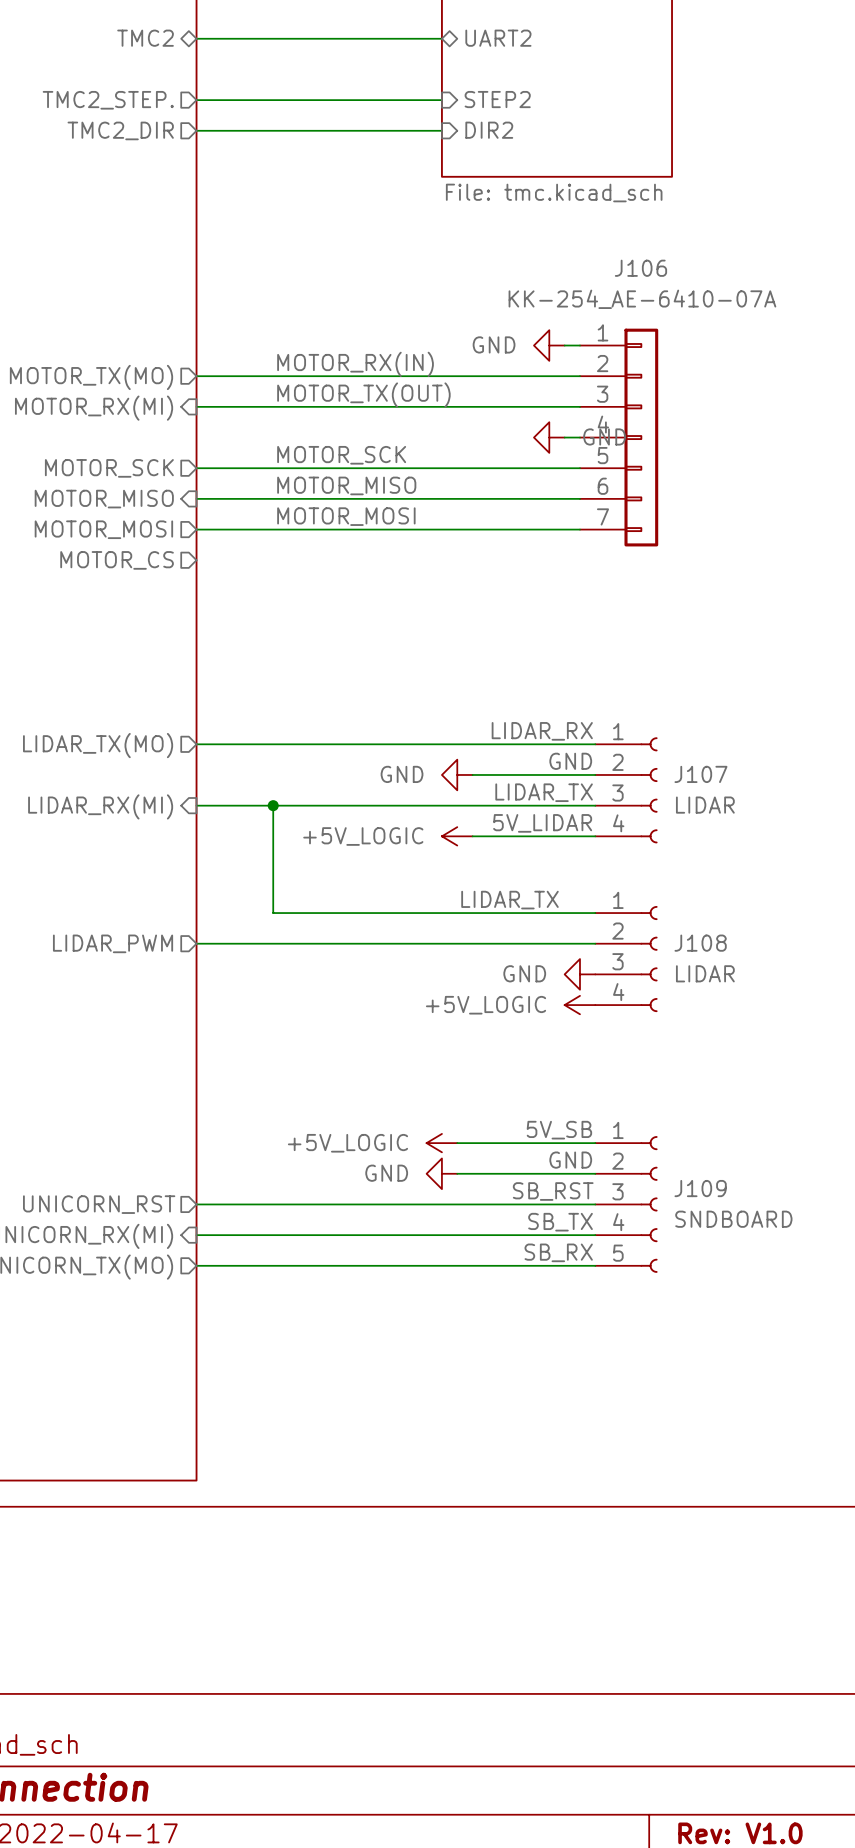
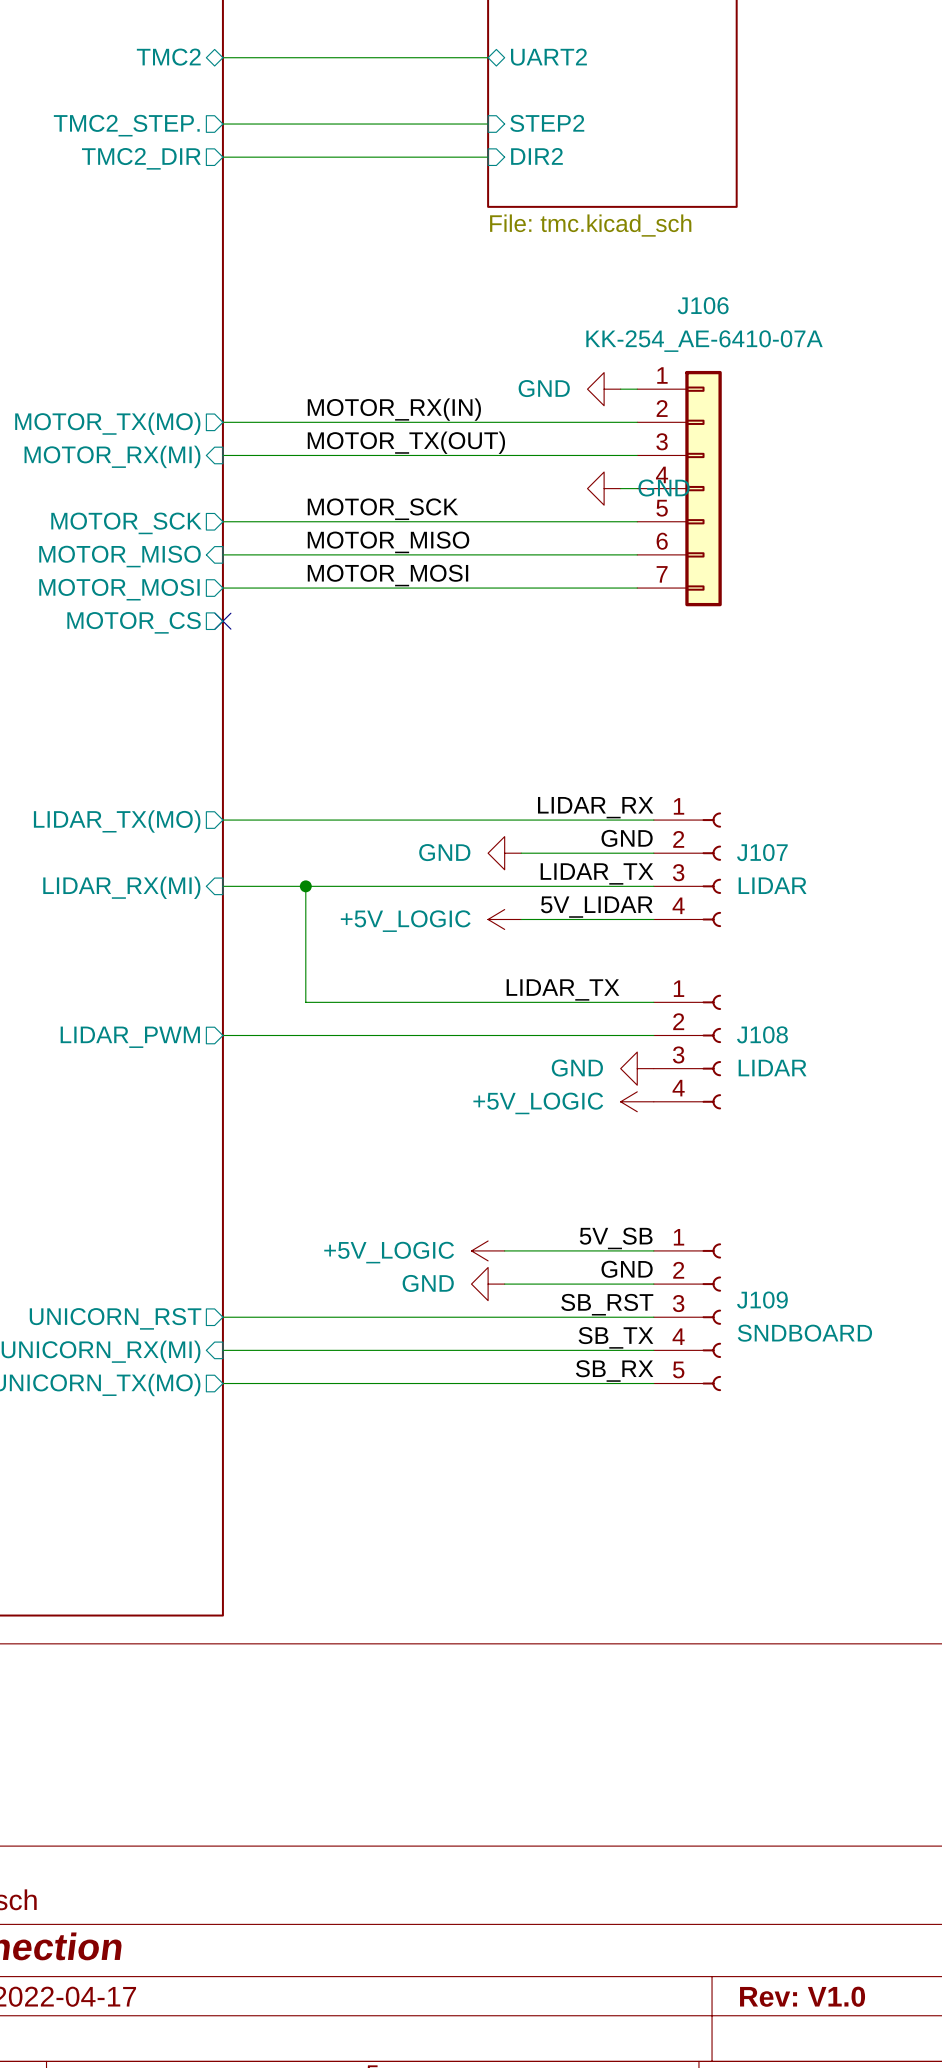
no-connect mark: none -> (222, 621)

